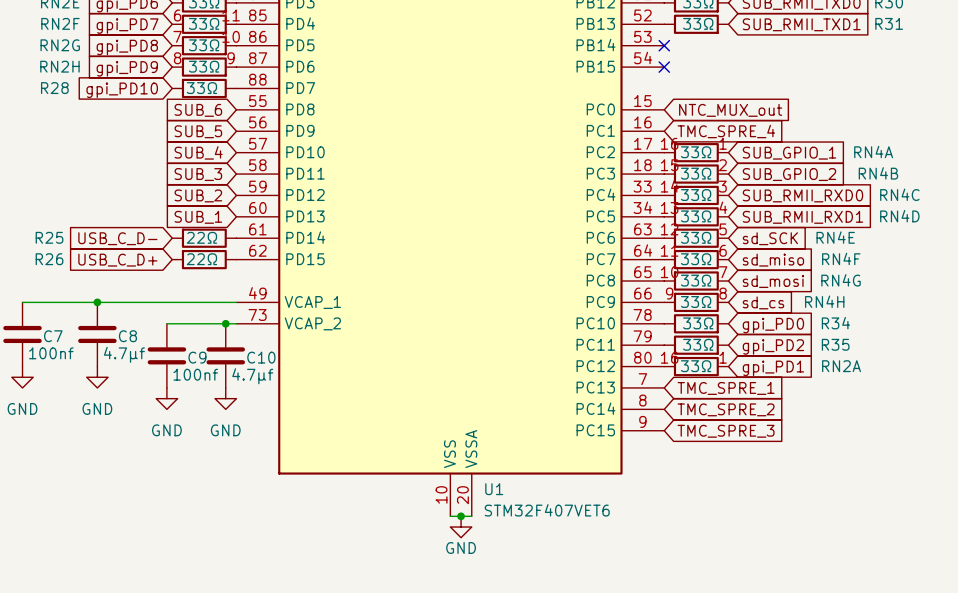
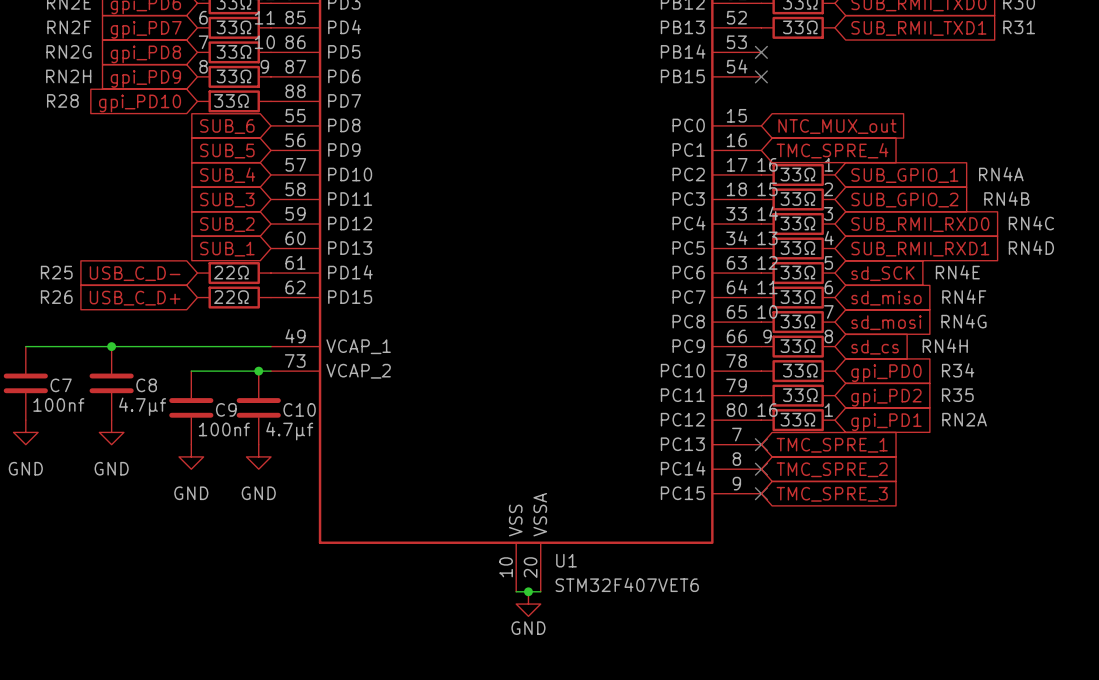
no-connect mark: none -> (761, 444)
no-connect mark: none -> (761, 469)
no-connect mark: none -> (761, 493)

